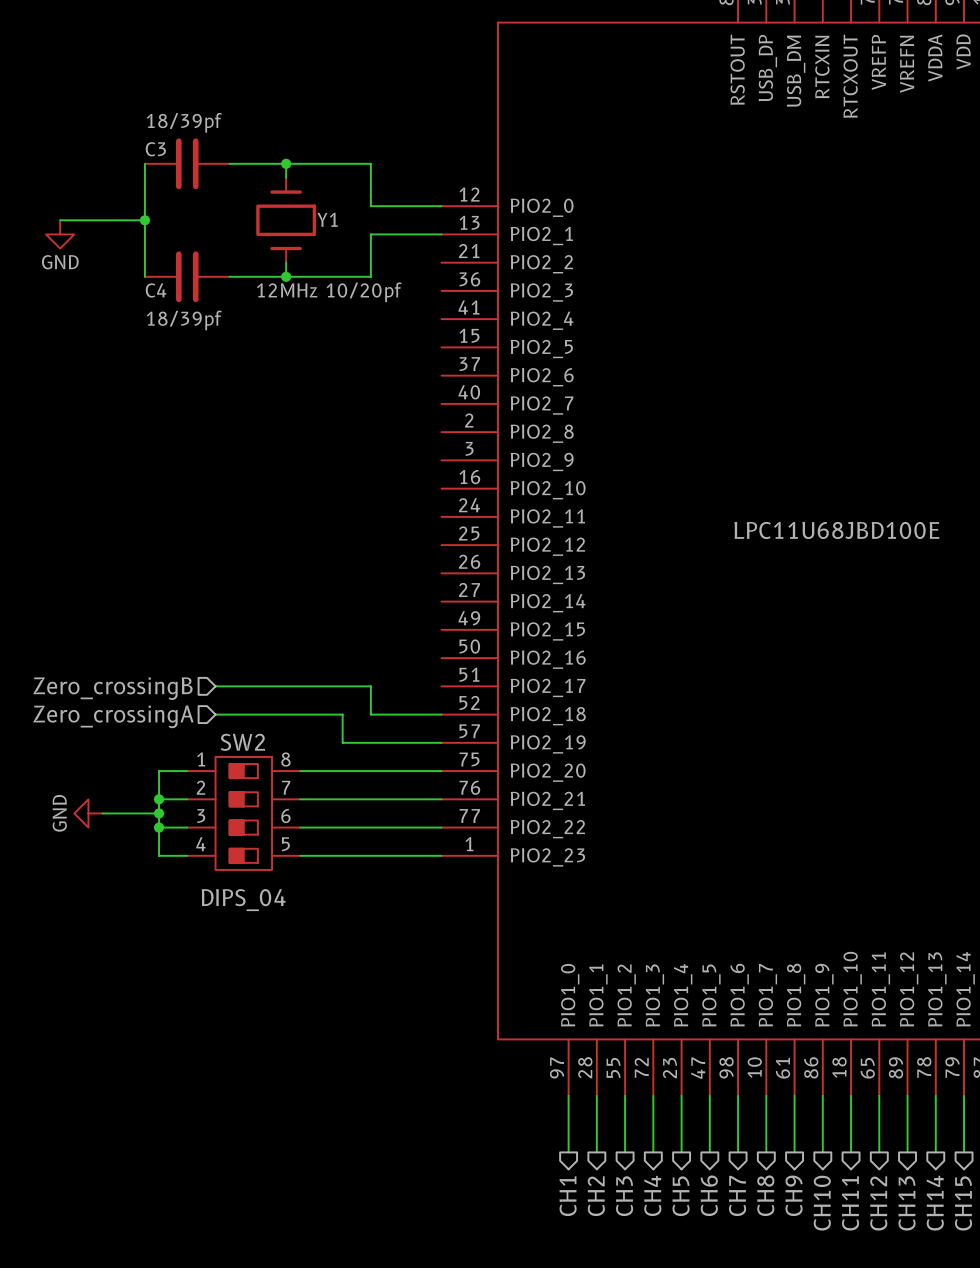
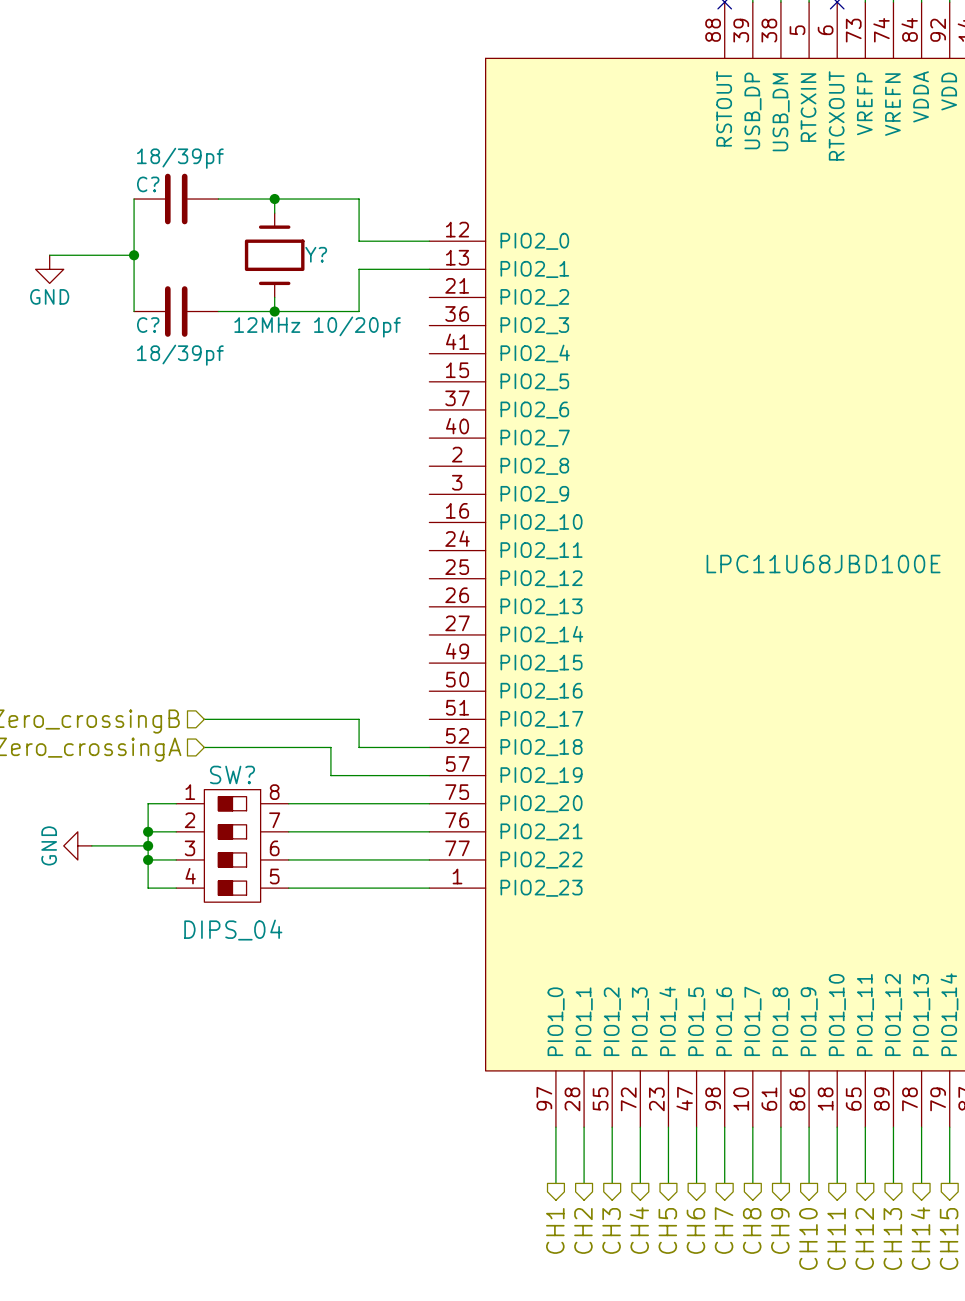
C3 name: C3 (155, 149) -> C? (148, 184)
Y1 name: Y1 (327, 219) -> Y? (316, 254)
C4 name: C4 (156, 290) -> C? (148, 325)
SW2 name: SW2 (242, 742) -> SW? (232, 774)

